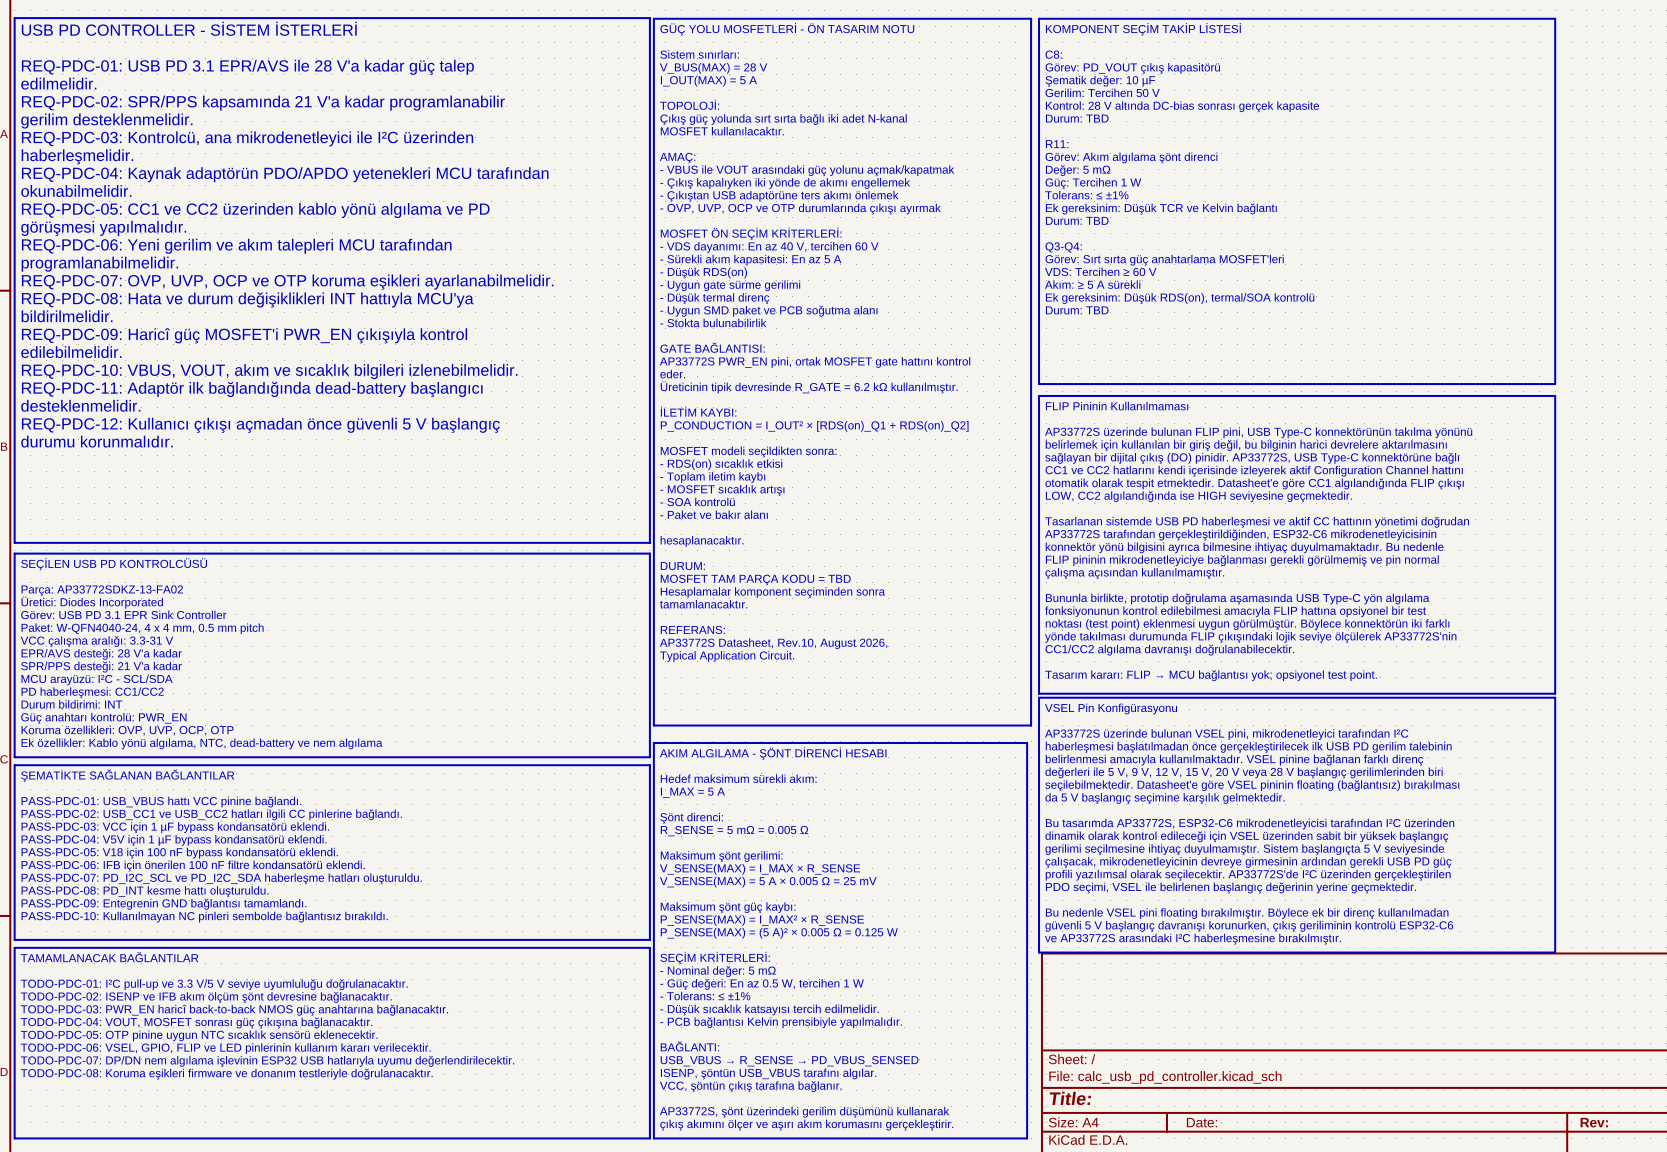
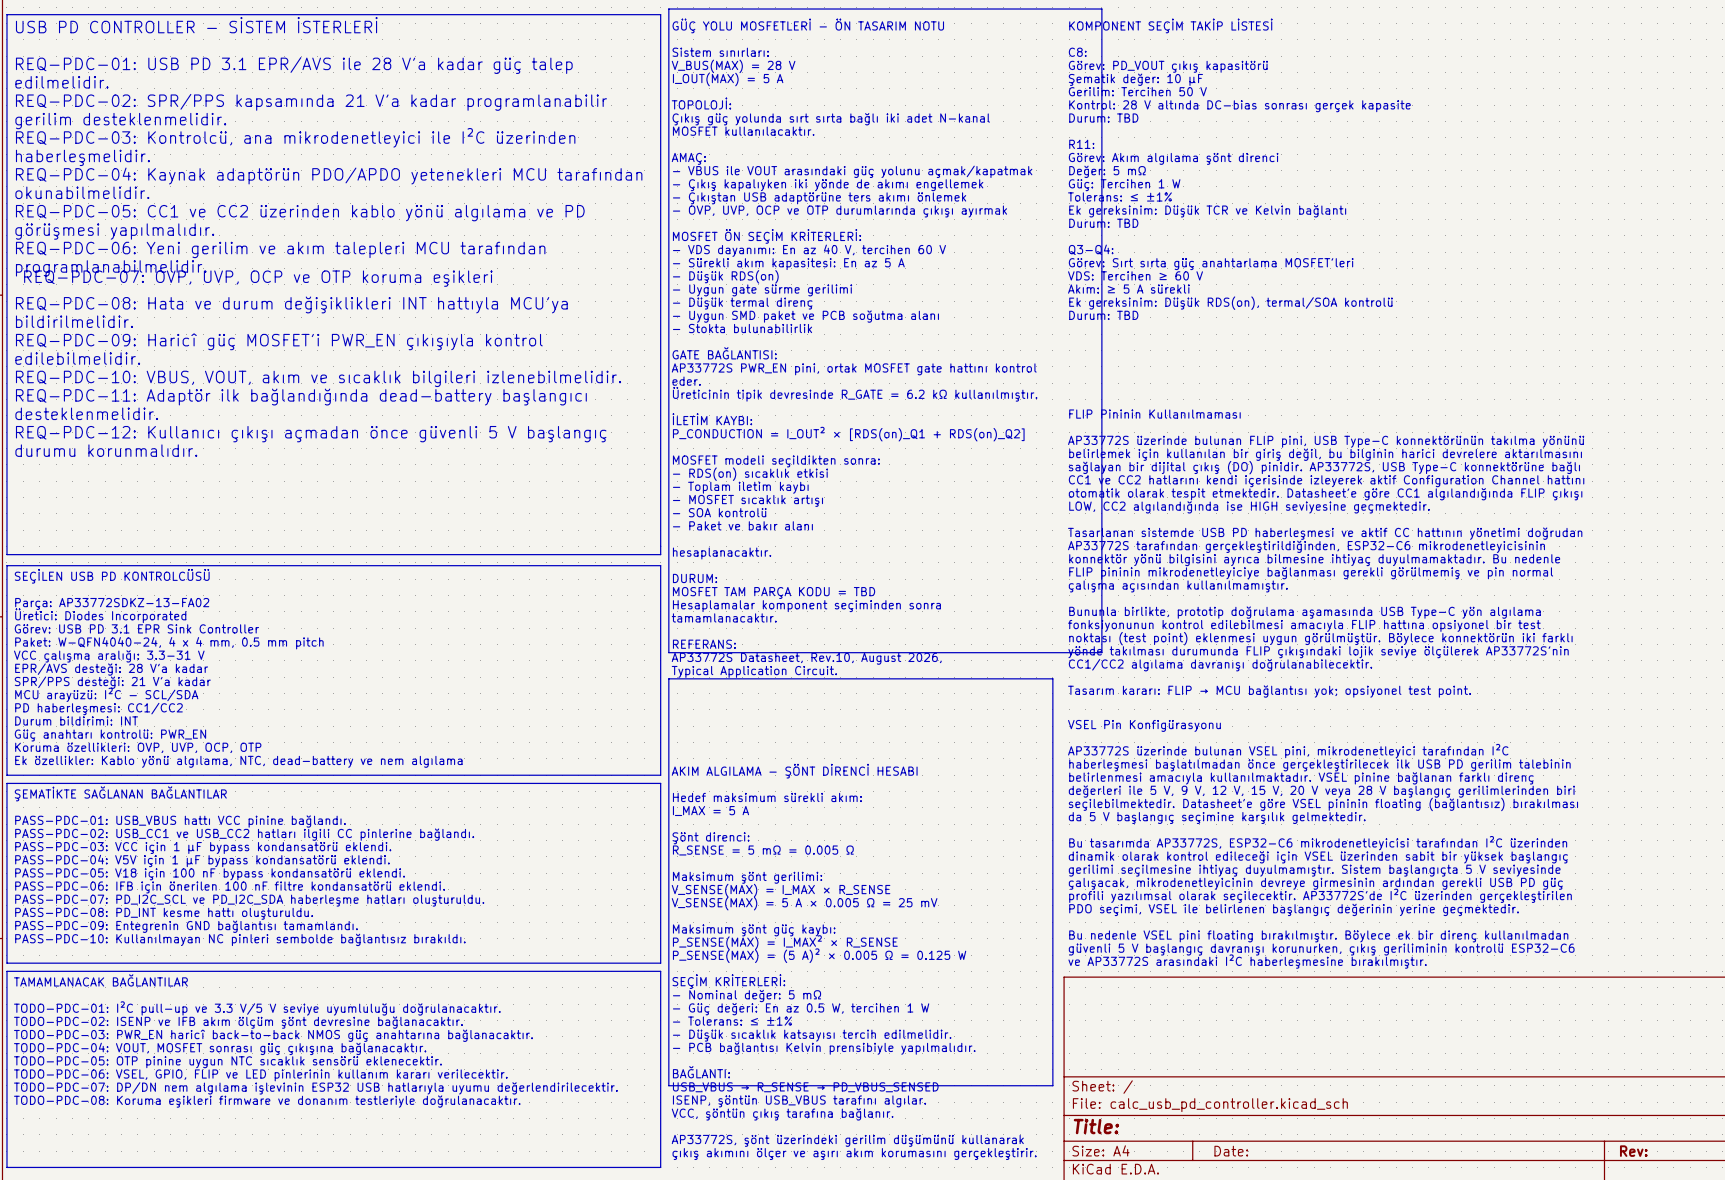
line: none -> (668, 9) (1101, 9) (1101, 652) (668, 652) (668, 9)
line: (1039, 18) (1039, 384) (1555, 384) (1555, 18) (1039, 18) -> none
text: REQ-PDC-07: OVP, UVP, OCP ve OTP koruma eşikleri ayarlanabilmelidir. (287, 282) -> REQ-PDC-07: OVP, UVP, OCP ve OTP koruma eşikleri (258, 278)
line: (1039, 395) (1555, 395) (1555, 693) (1039, 693) (1039, 395) -> none
line: (1031, 663) (1031, 18) (653, 18) (653, 725) (1031, 725) -> (1052, 678) (668, 678) (668, 1085) (1052, 1085) (1052, 742)
line: (1039, 697) (1039, 952) (1555, 952) (1555, 697) (1039, 697) -> none
line: (653, 743) (1027, 743) (1027, 1138) (653, 1138) (653, 743) -> none

